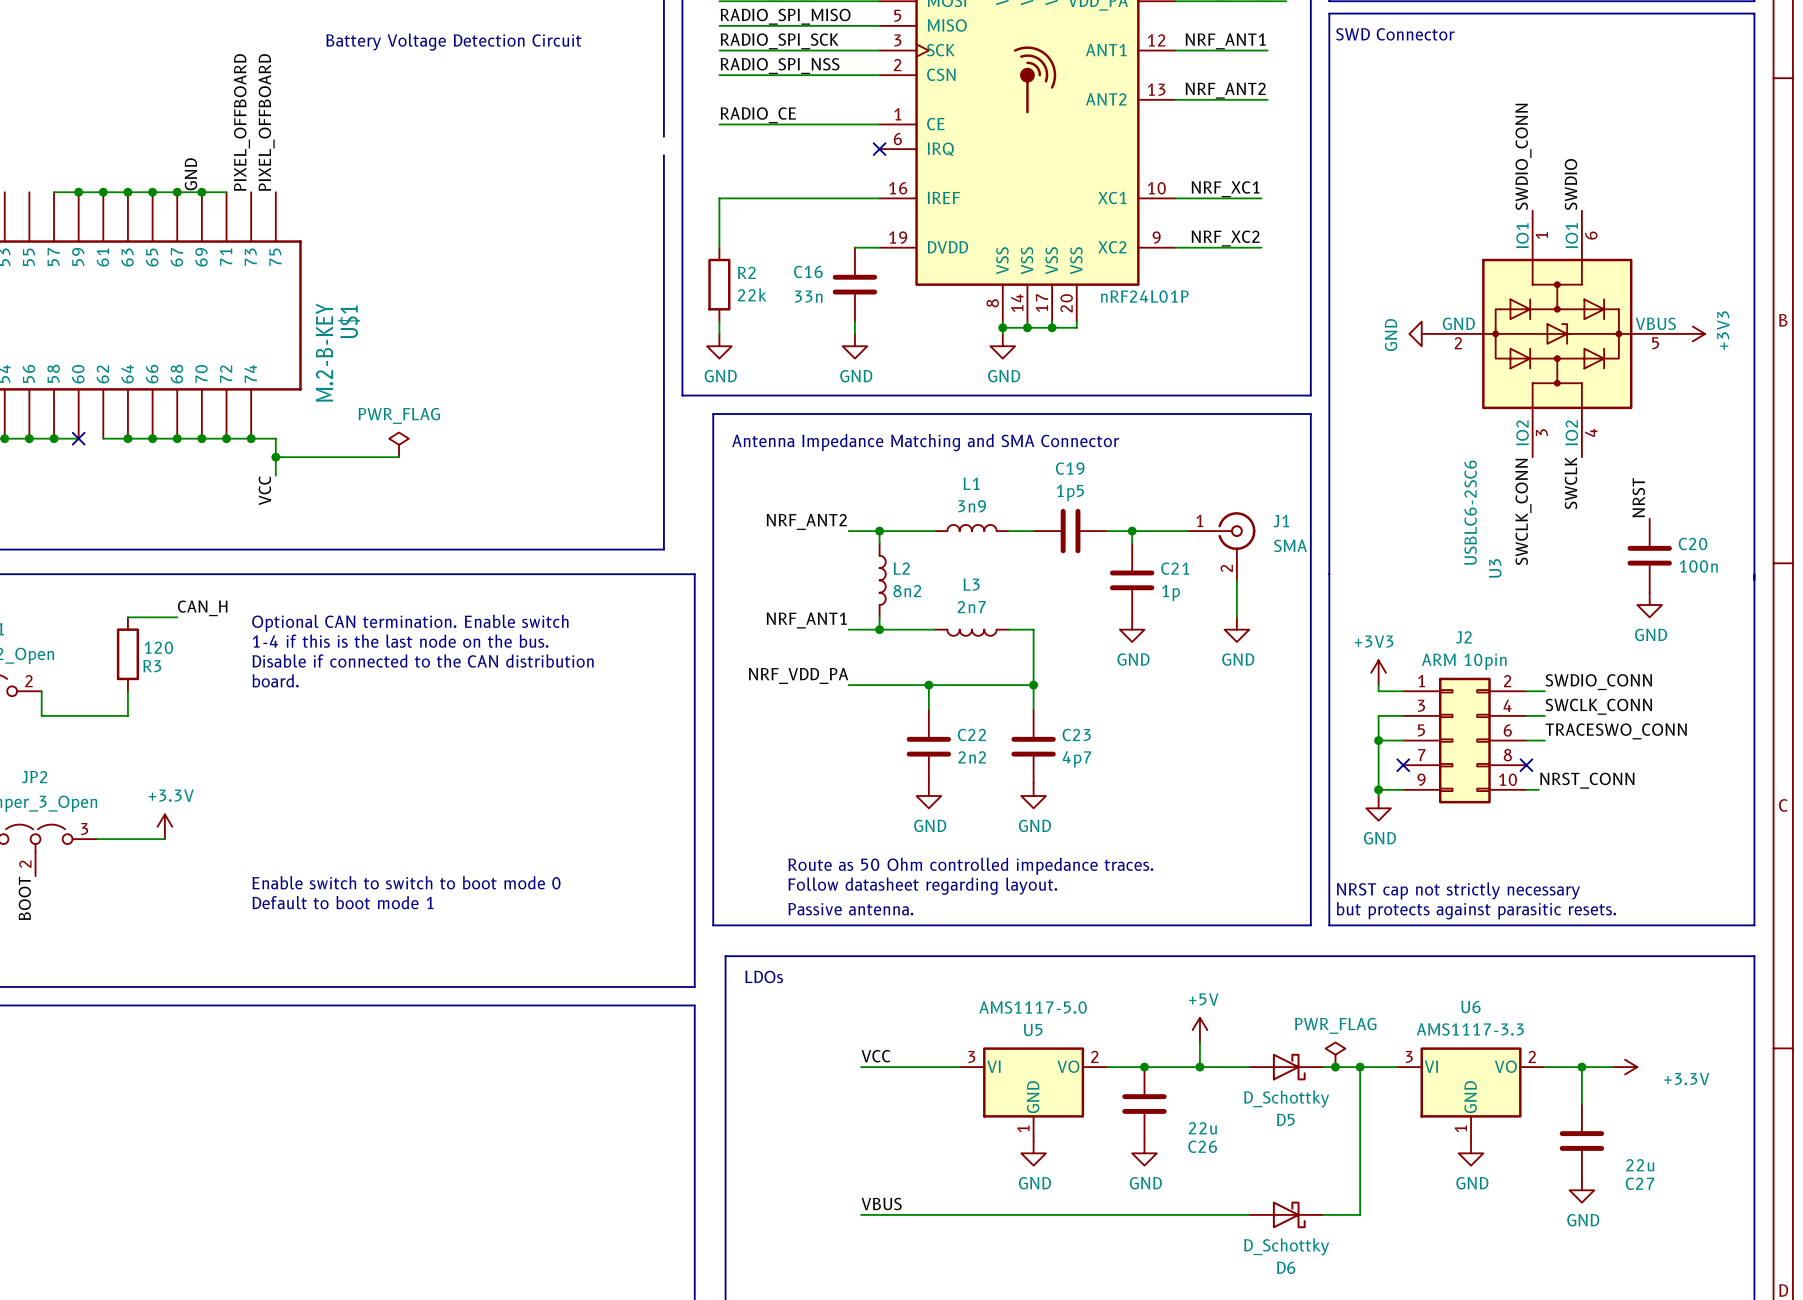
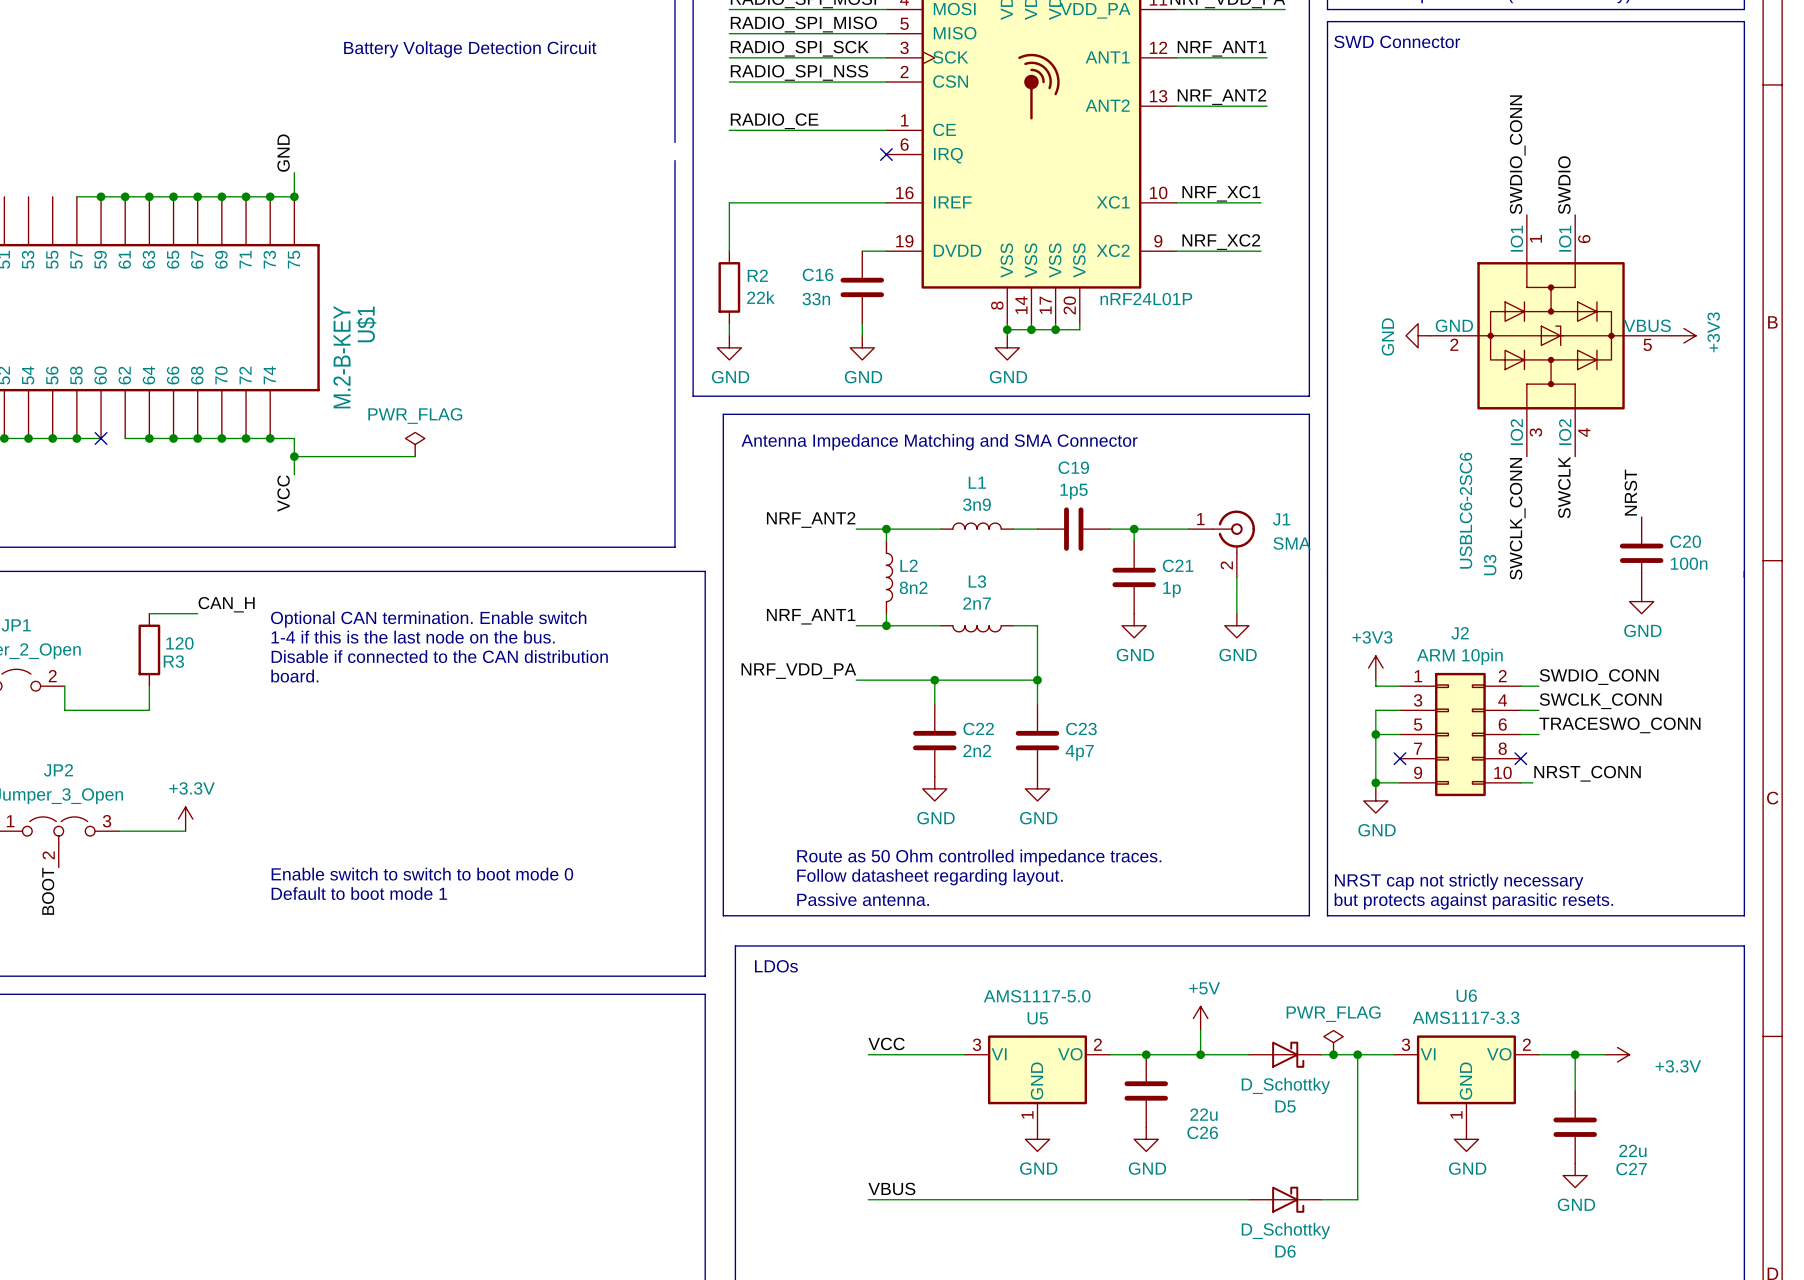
label: PIXEL_OFFBOARD (242, 122) -> none
label: PIXEL_OFFBOARD (266, 122) -> none
wire: none -> (294, 172) (294, 196) (246, 196)
label position: GND (190, 174) -> GND (283, 153)
junction: none -> (246, 196)
junction: none -> (270, 196)
junction: none -> (294, 196)

